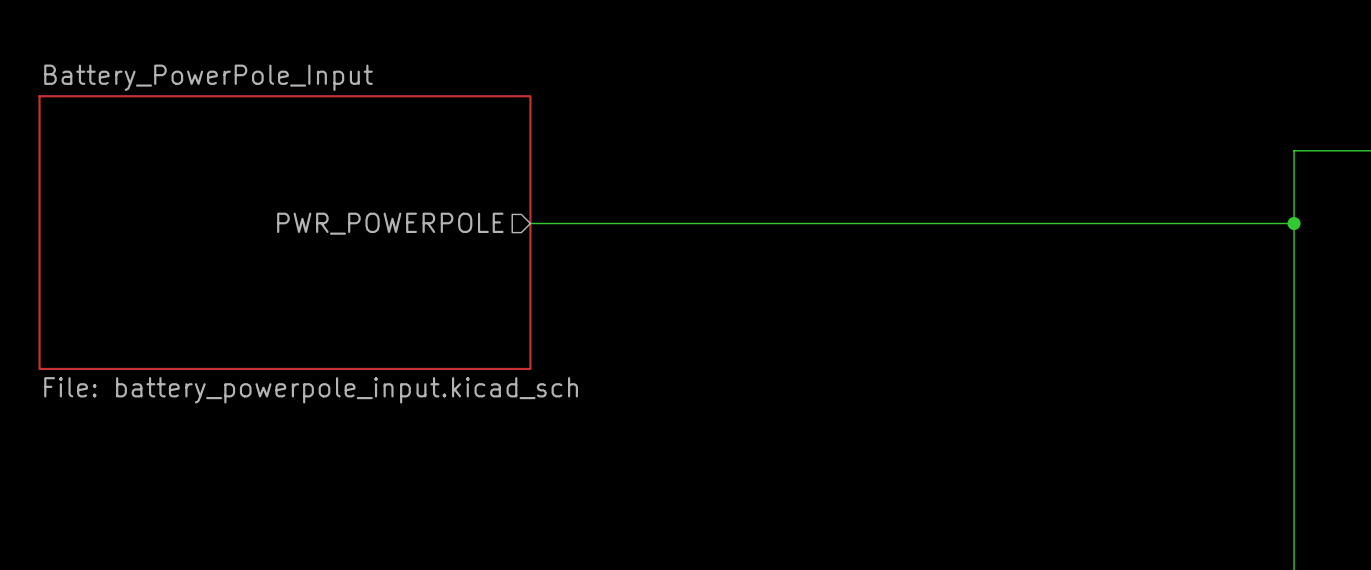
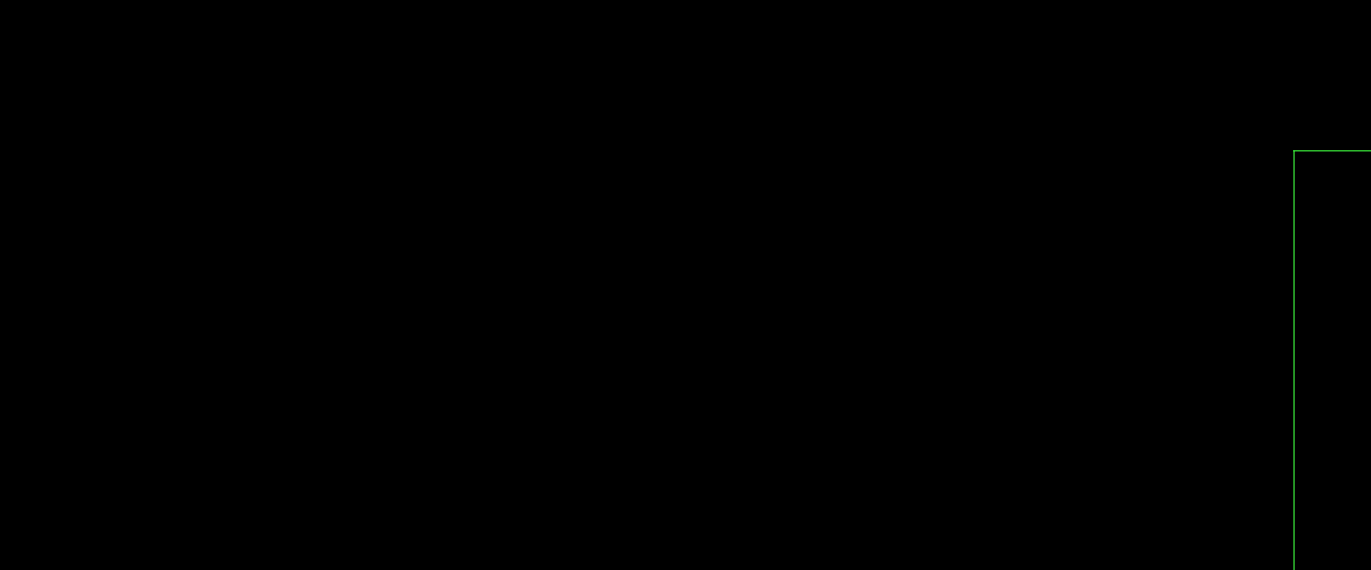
sheet pin: PWR_POWERPOLE (390, 223) -> none
wire: (530, 223) (1294, 223) -> none
junction: (1294, 223) -> none
sheet Battery_PowerPole_Input: File: battery_powerpole_input.kicad_sch (284, 232) -> none

